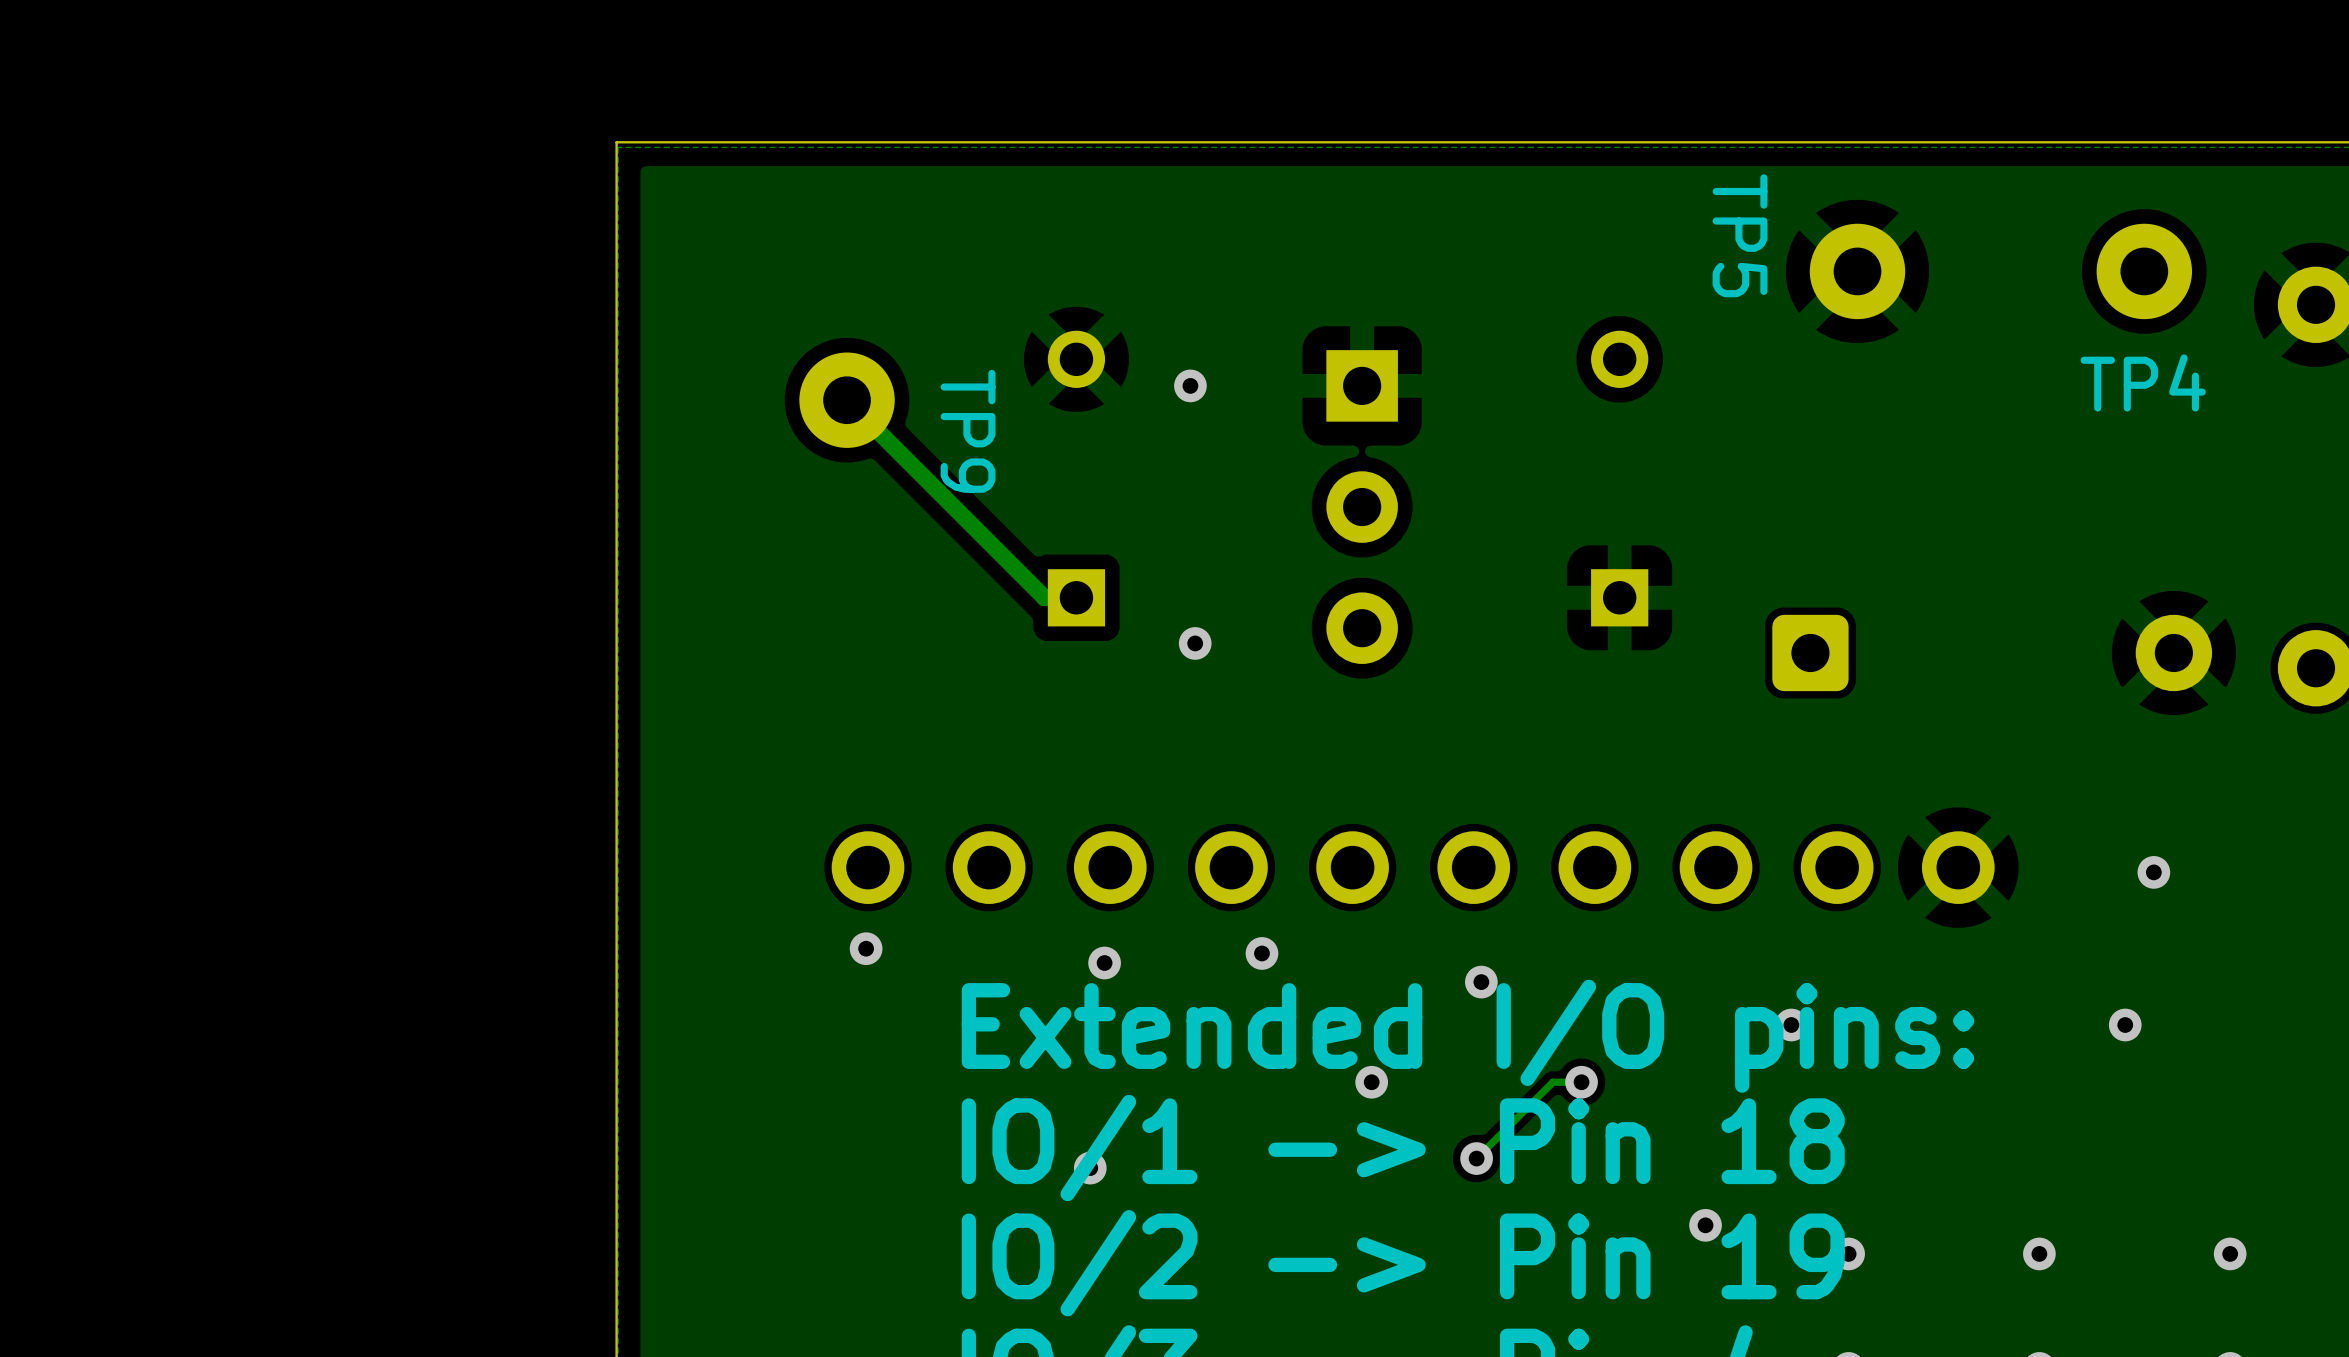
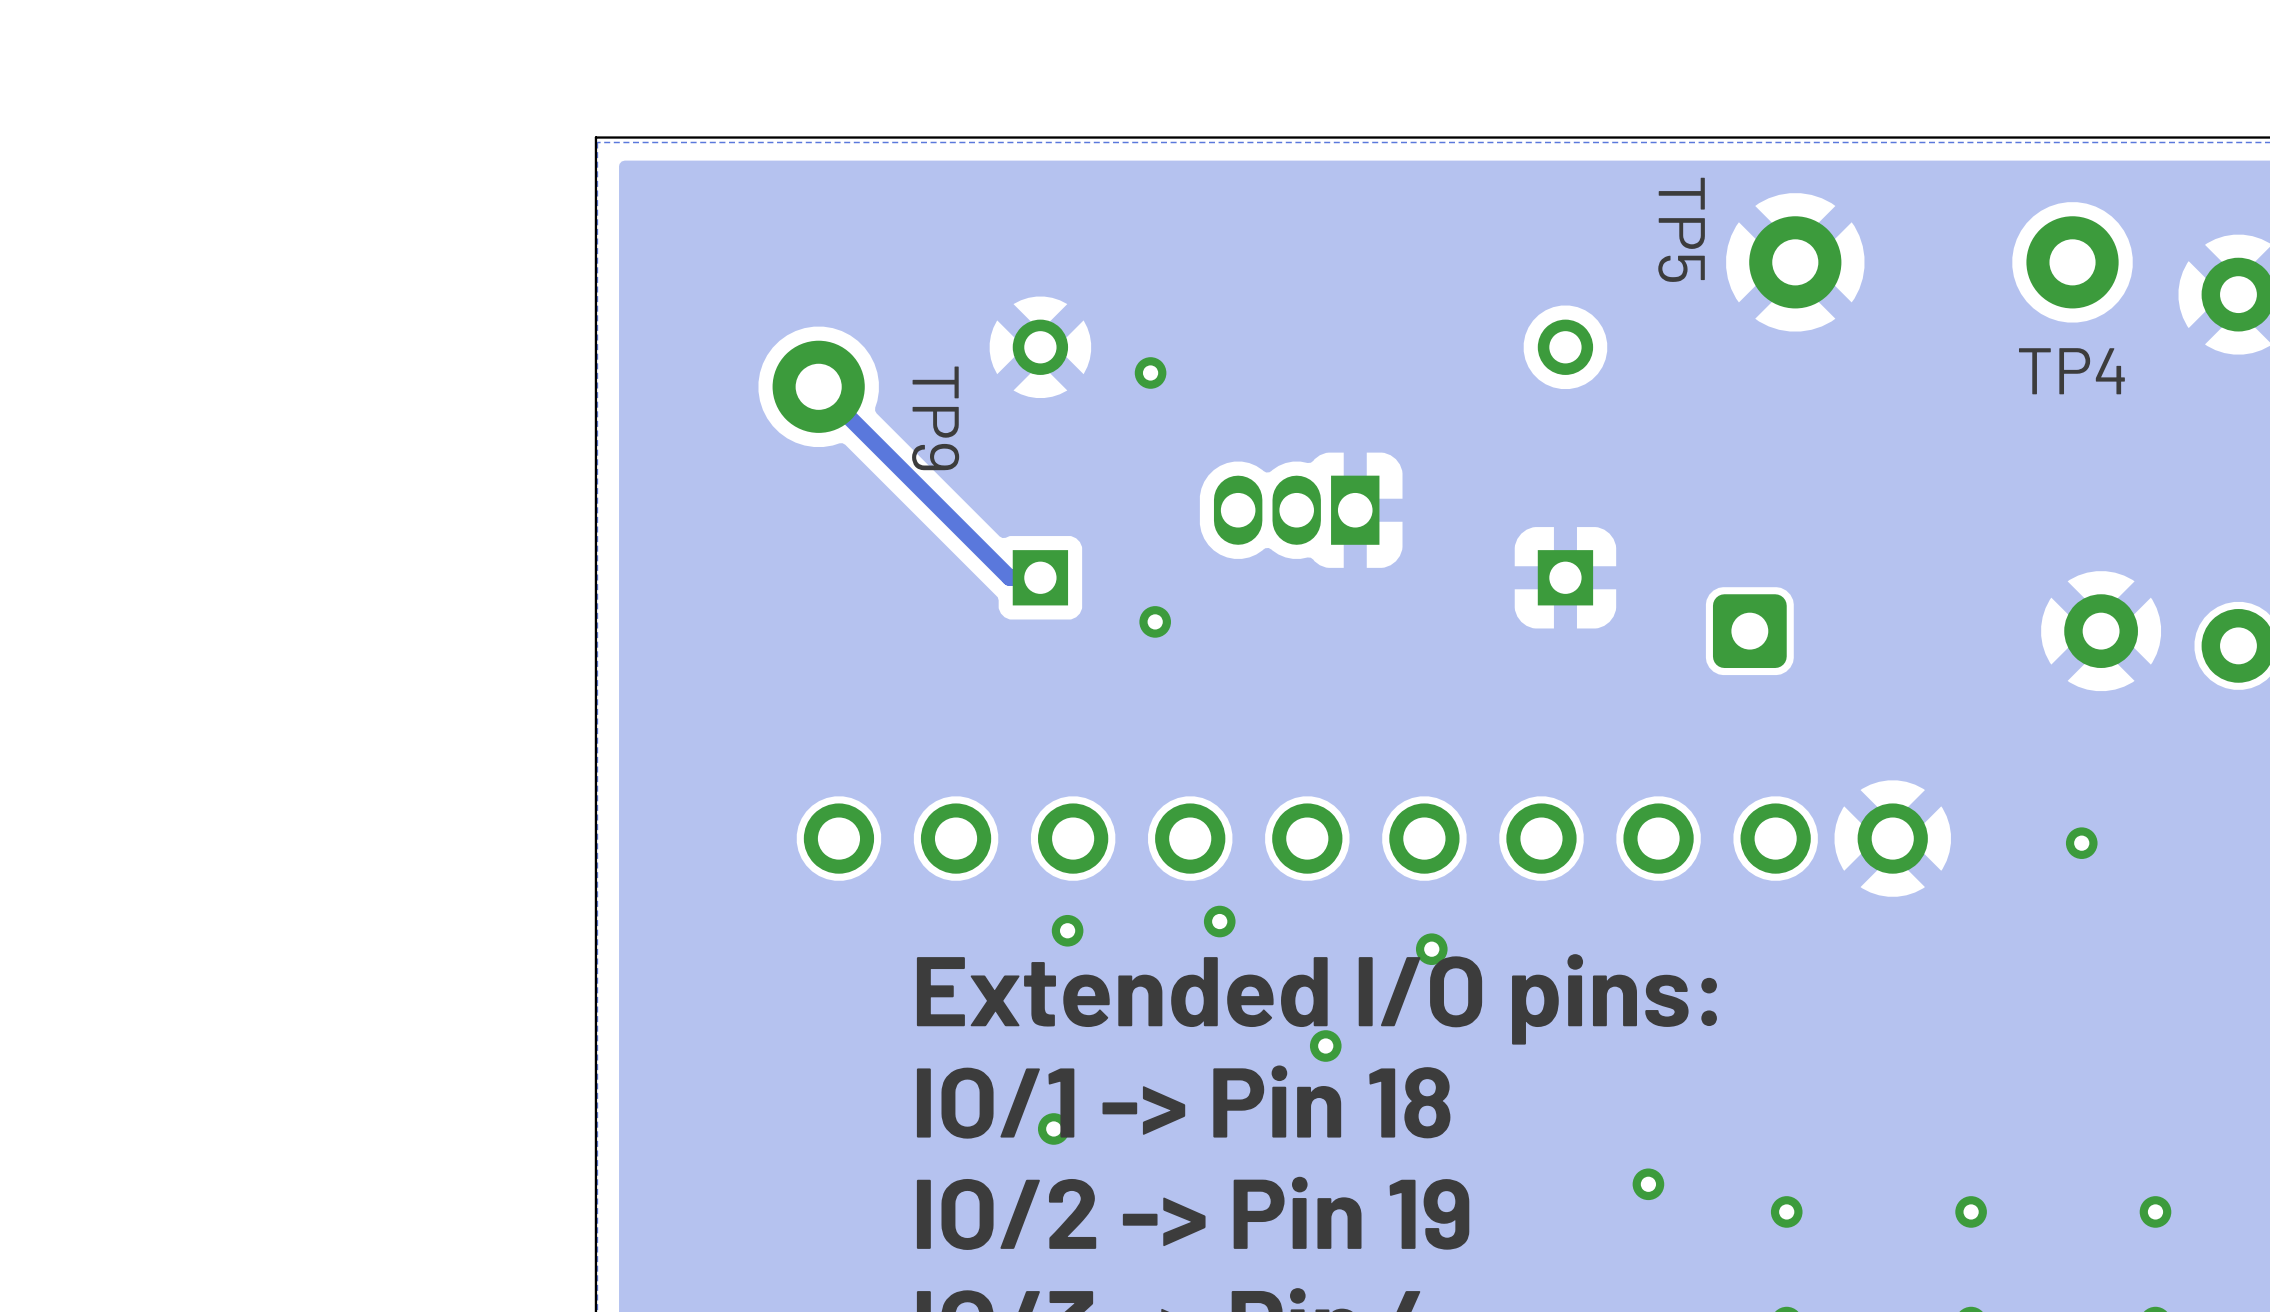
part footprint: [1326, 350, 1398, 664] -> [1213, 475, 1380, 545]
via: (866, 948) -> none
via: (1791, 1025) -> none
via: (2125, 1025) -> none
track: (1581, 1082) (1552, 1082) (1476, 1158) -> none
via: (1581, 1082) -> none
via: (1476, 1158) -> none

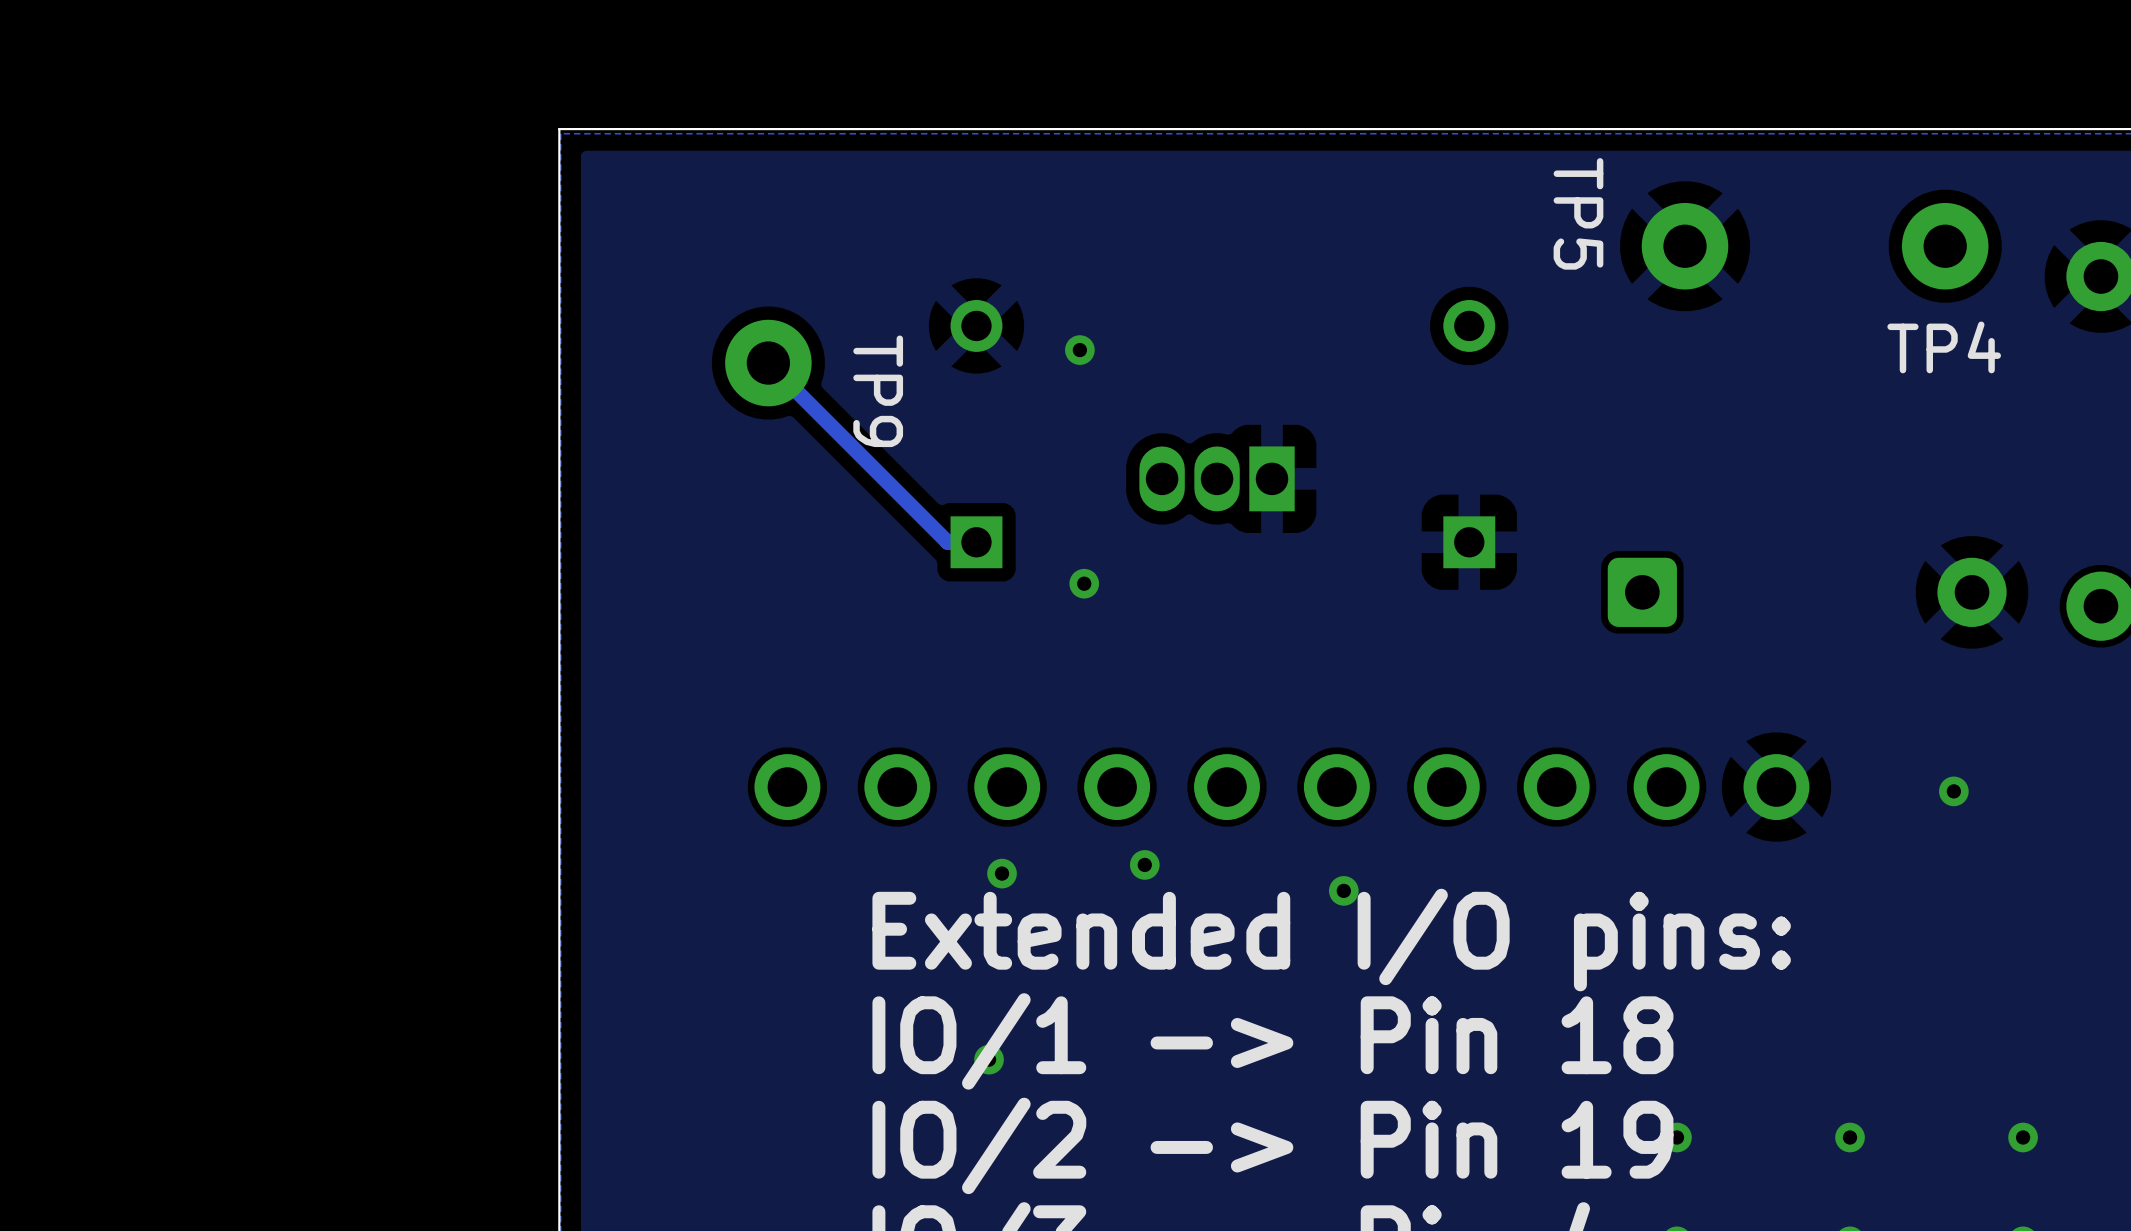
via: (1325, 1046) -> none
via: (1648, 1184) -> none

